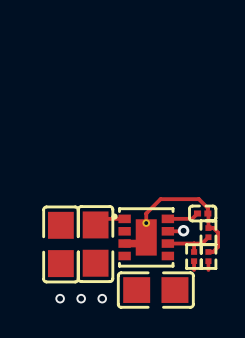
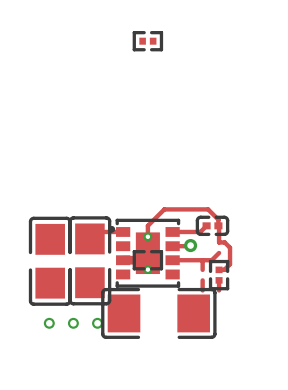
part: none -> (147, 41)
part footprint: [111, 207, 175, 268] -> [108, 218, 181, 288]
part: (208, 232) -> none
part: none -> (147, 260)
part: (194, 256) -> none
part footprint: [116, 271, 195, 309] -> [101, 287, 217, 339]

